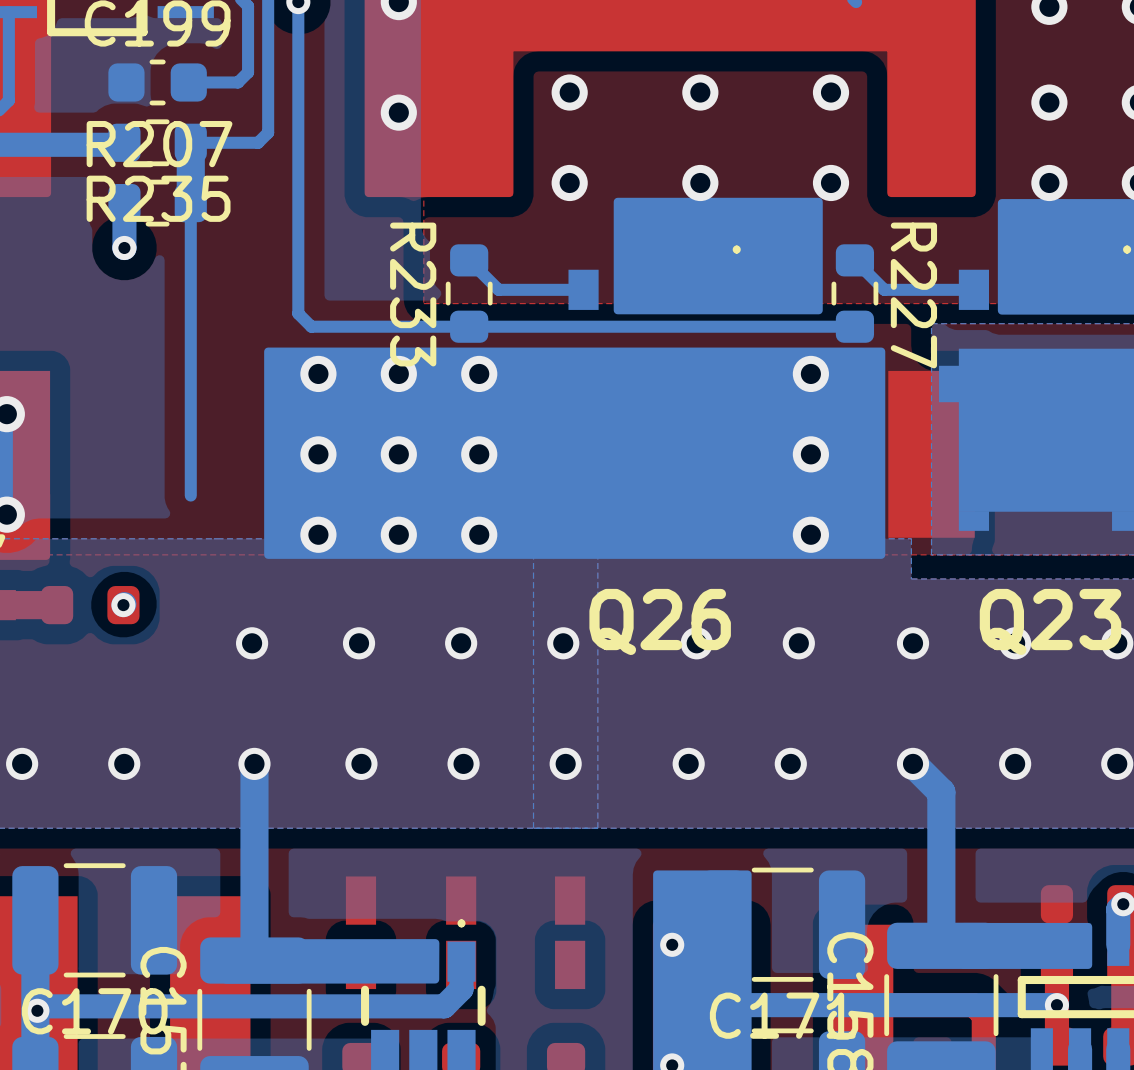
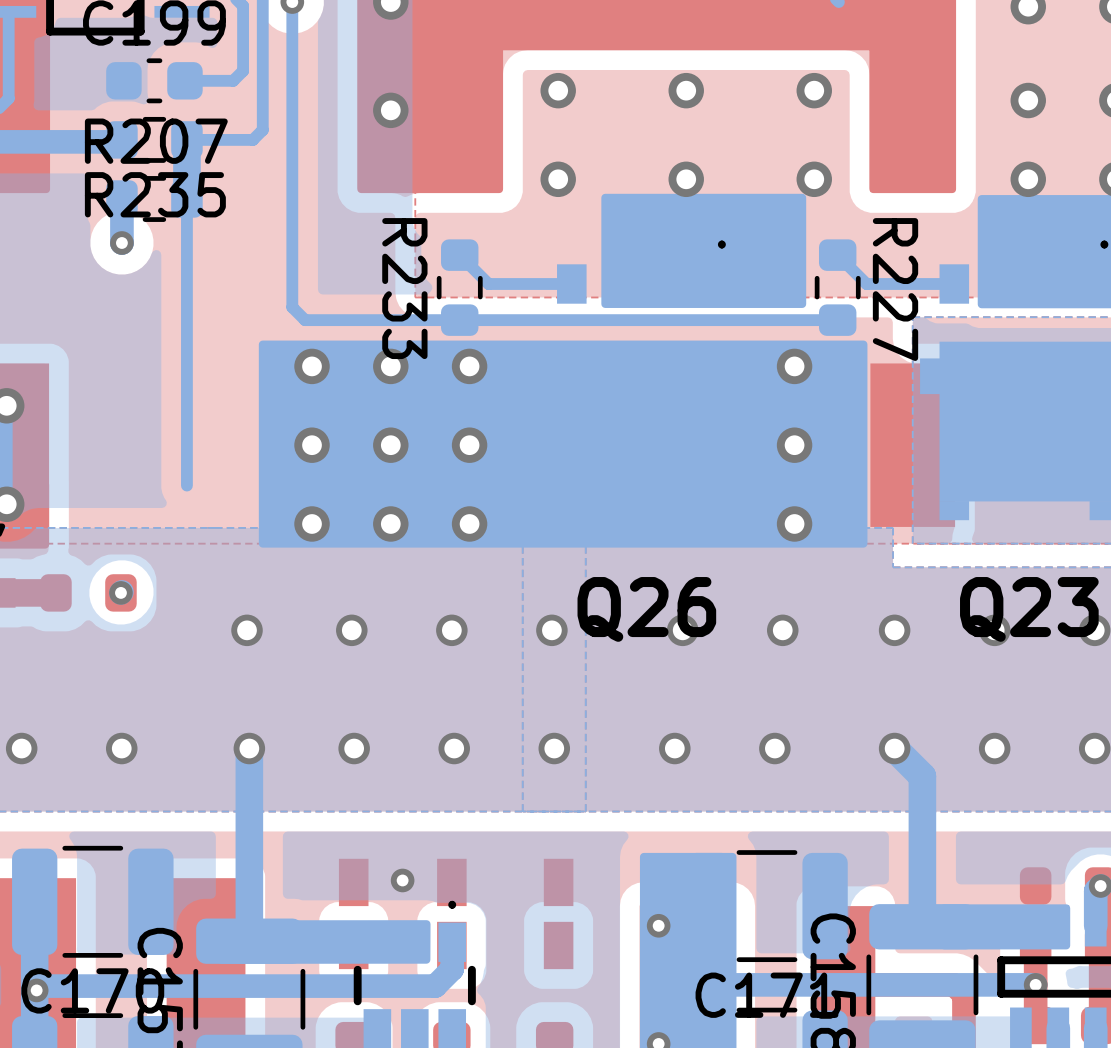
via: none -> (402, 880)

